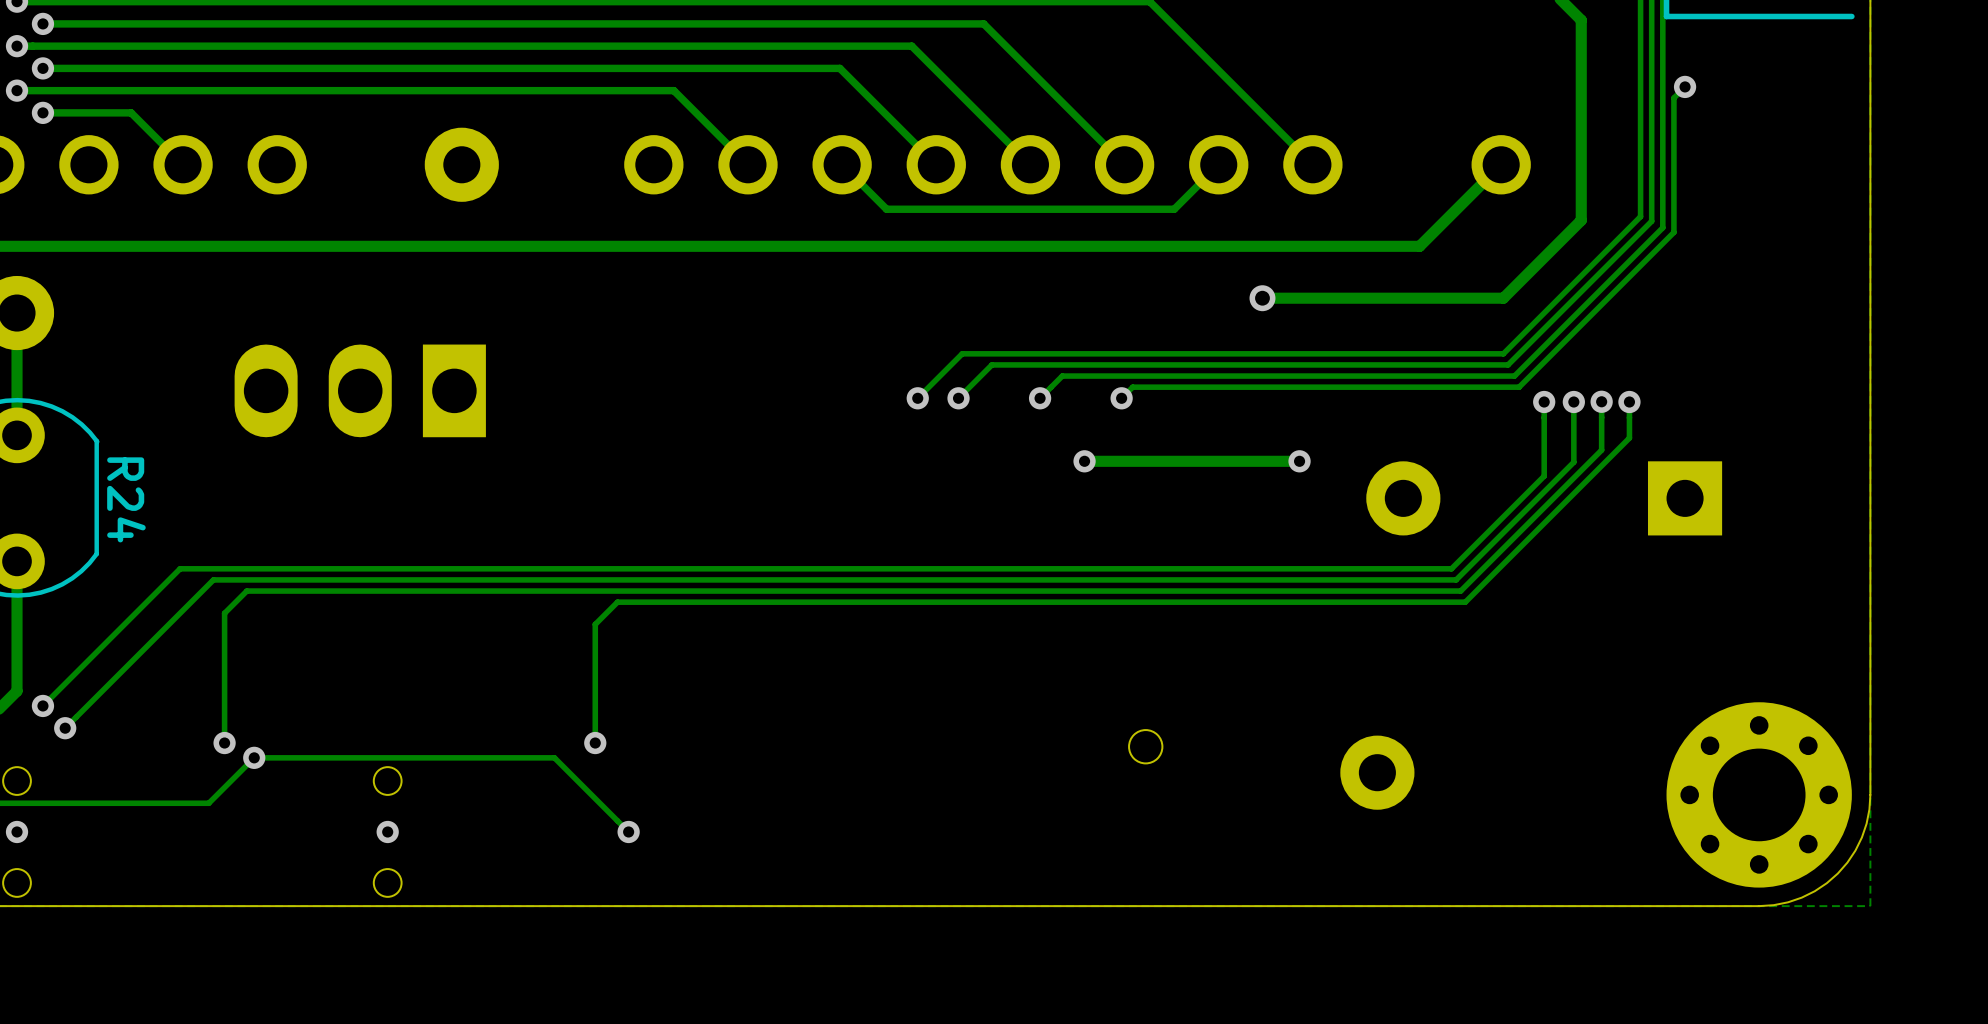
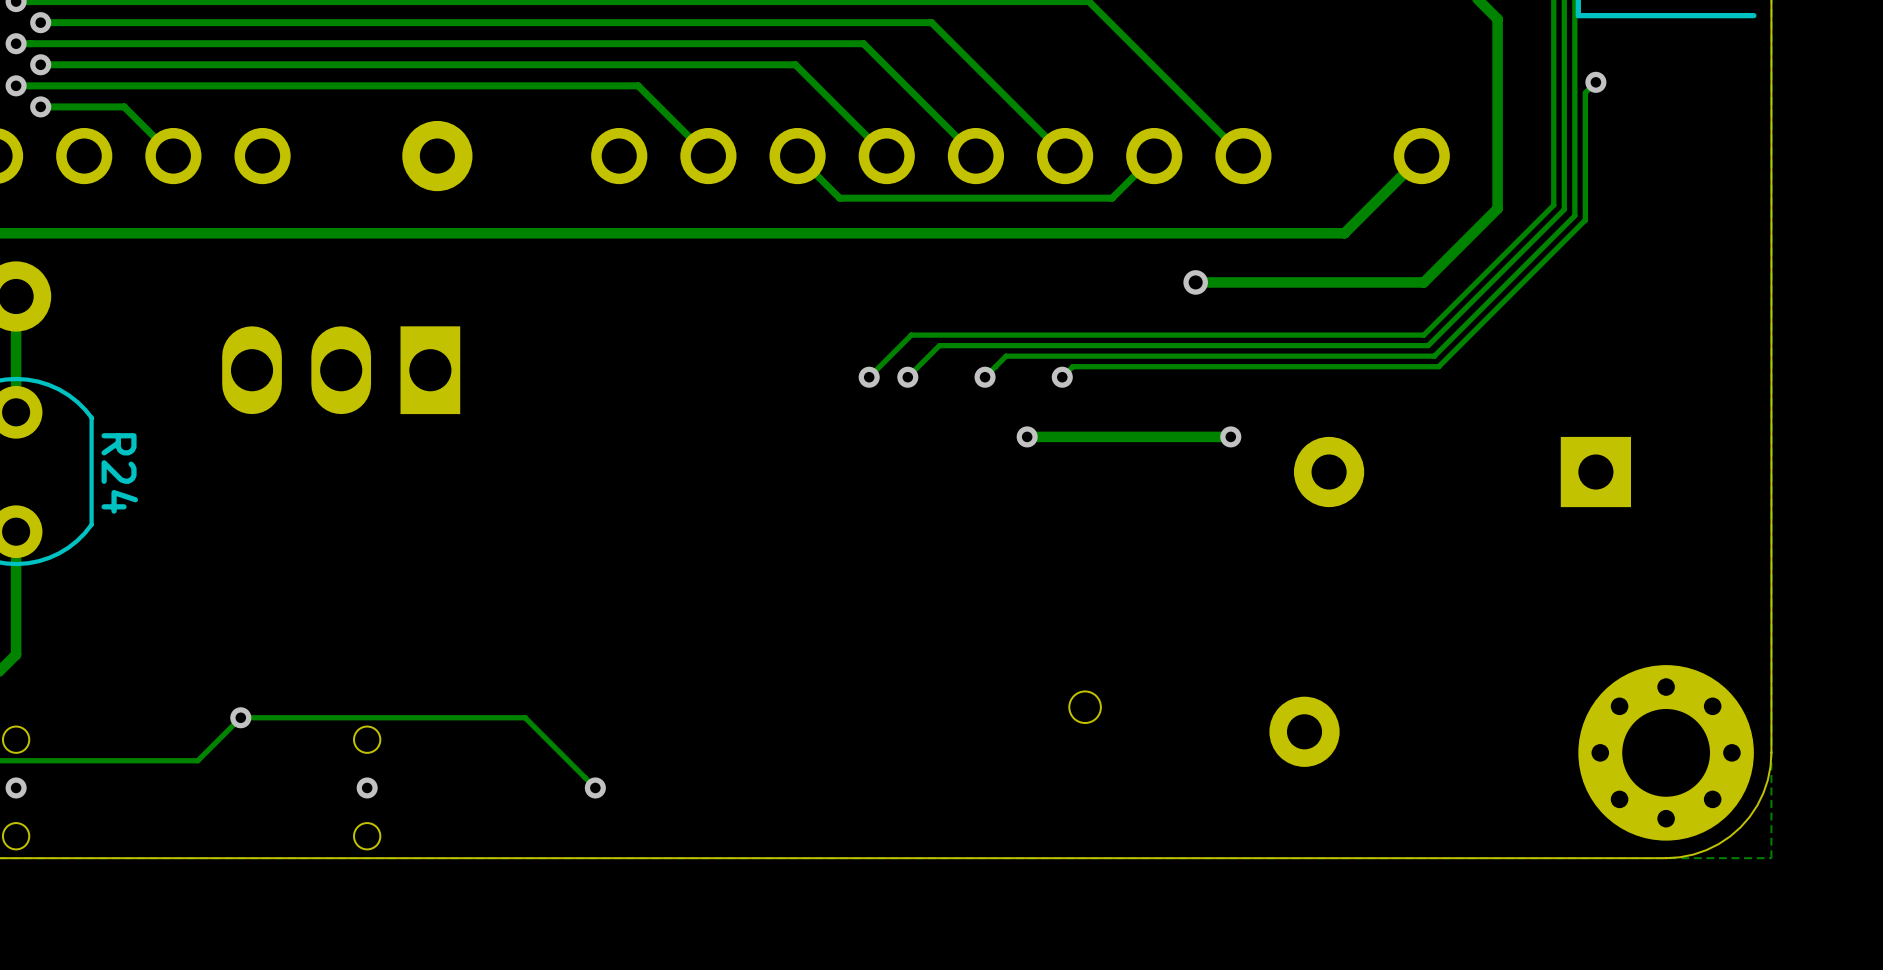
track: (1601, 401) (1601, 450) (1460, 591) (246, 591) (224, 613) (224, 743) -> none
via: (1601, 401) -> none
track: (1544, 402) (1544, 476) (1451, 568) (180, 568) (42, 705) -> none
via: (1544, 402) -> none
track: (1573, 402) (1573, 462) (1456, 579) (213, 579) (65, 728) -> none
via: (1573, 402) -> none
track: (1629, 402) (1629, 438) (1465, 602) (617, 602) (595, 624) (595, 743) -> none
via: (1629, 402) -> none
via: (42, 705) -> none
via: (65, 728) -> none
via: (224, 743) -> none
via: (595, 743) -> none

